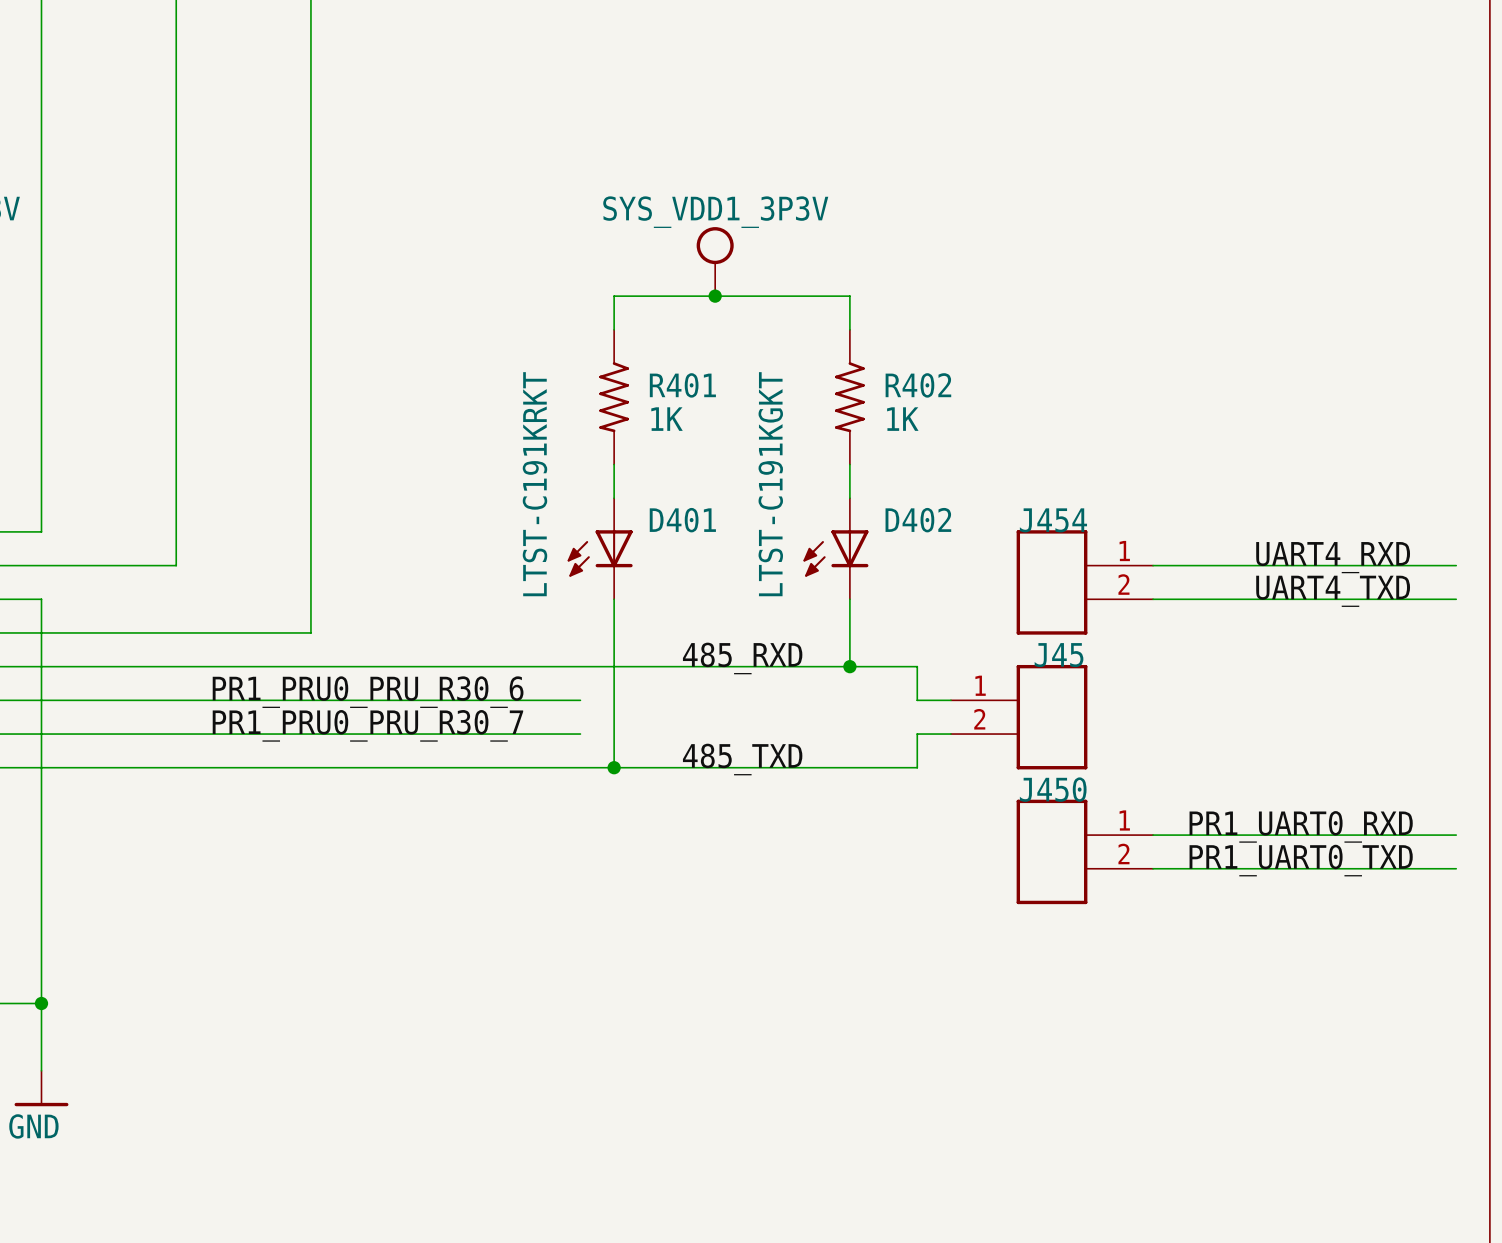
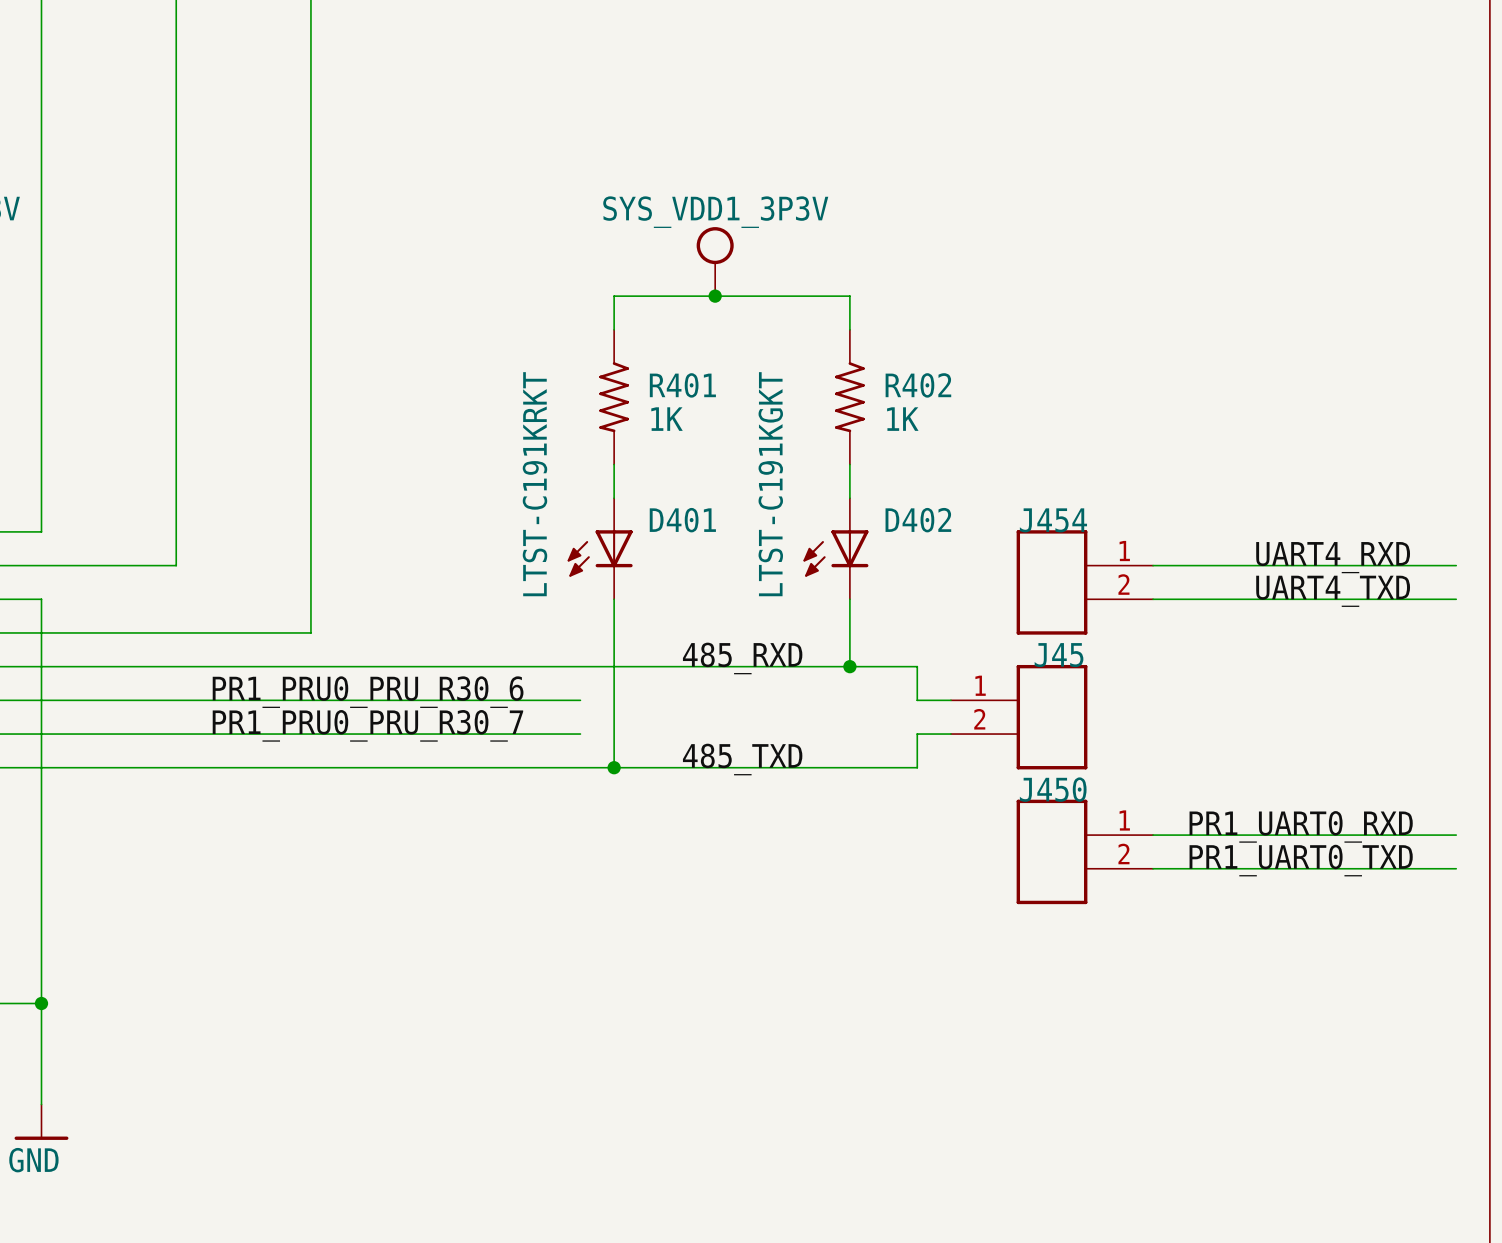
power symbol position: GND (41, 1088) -> GND (41, 1122)

